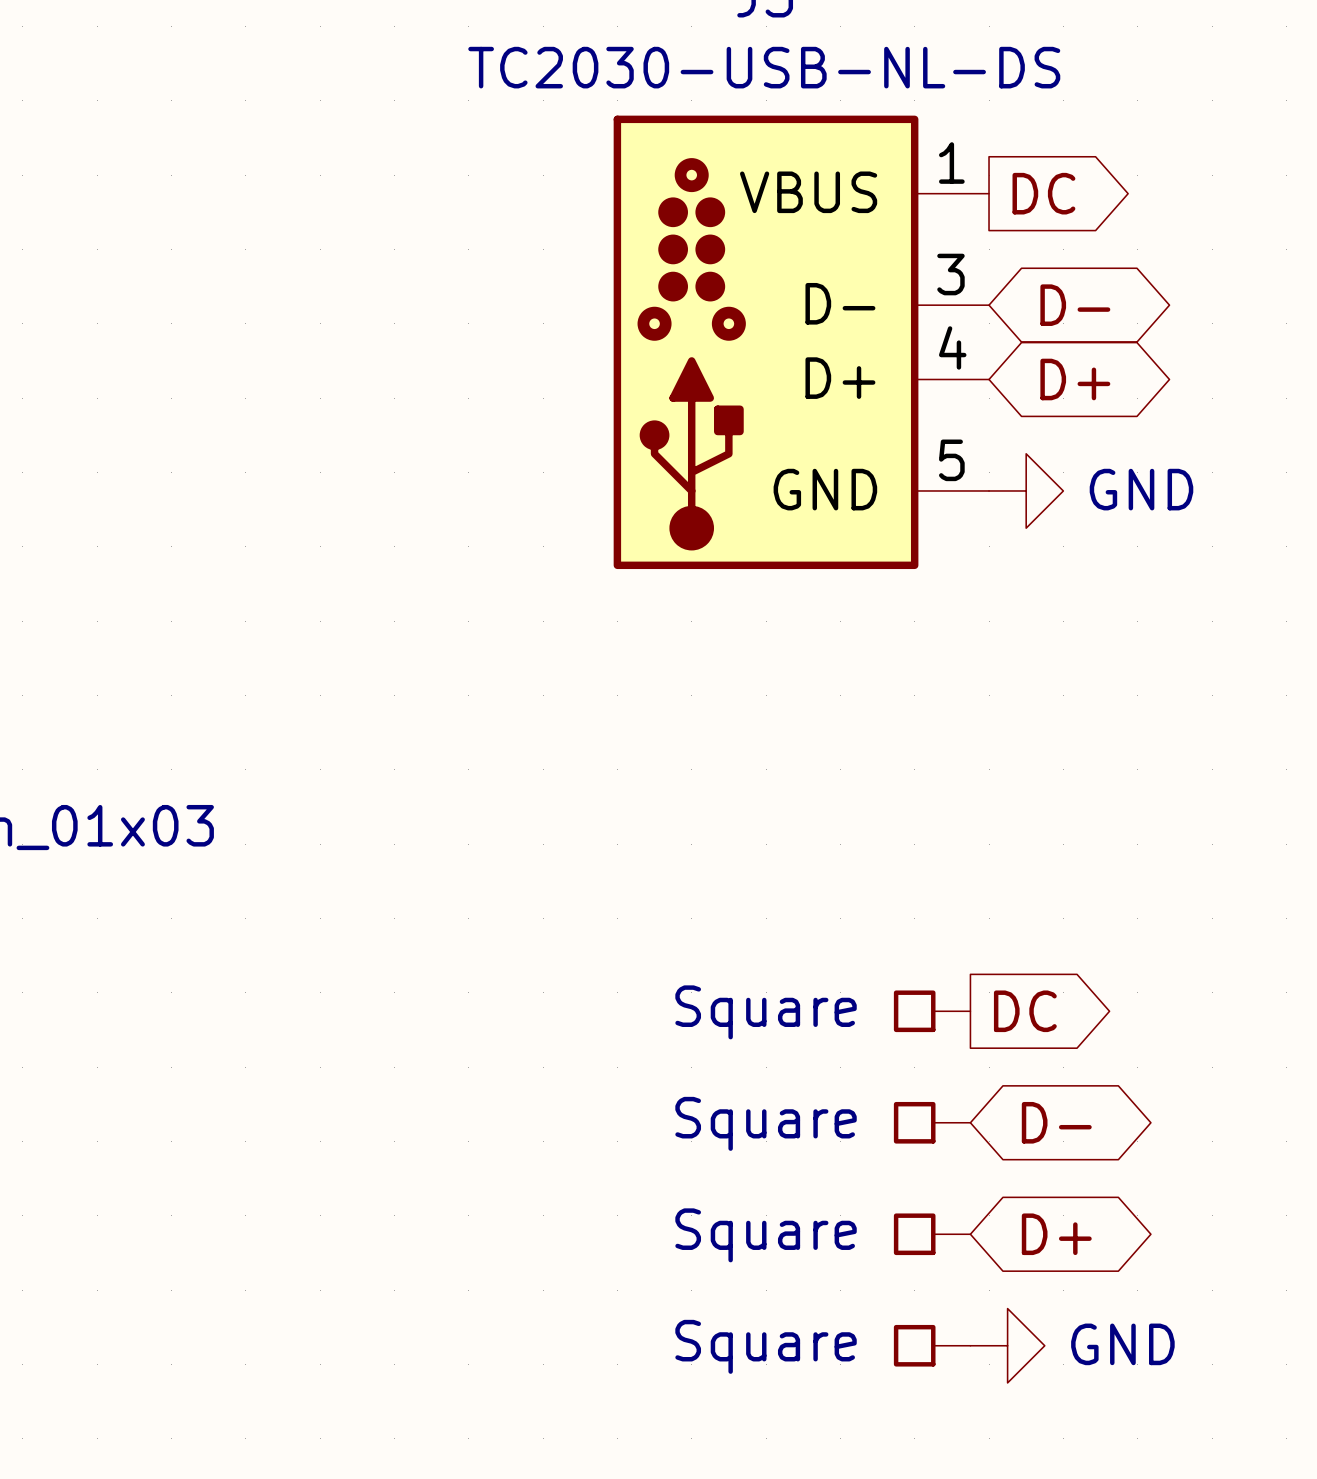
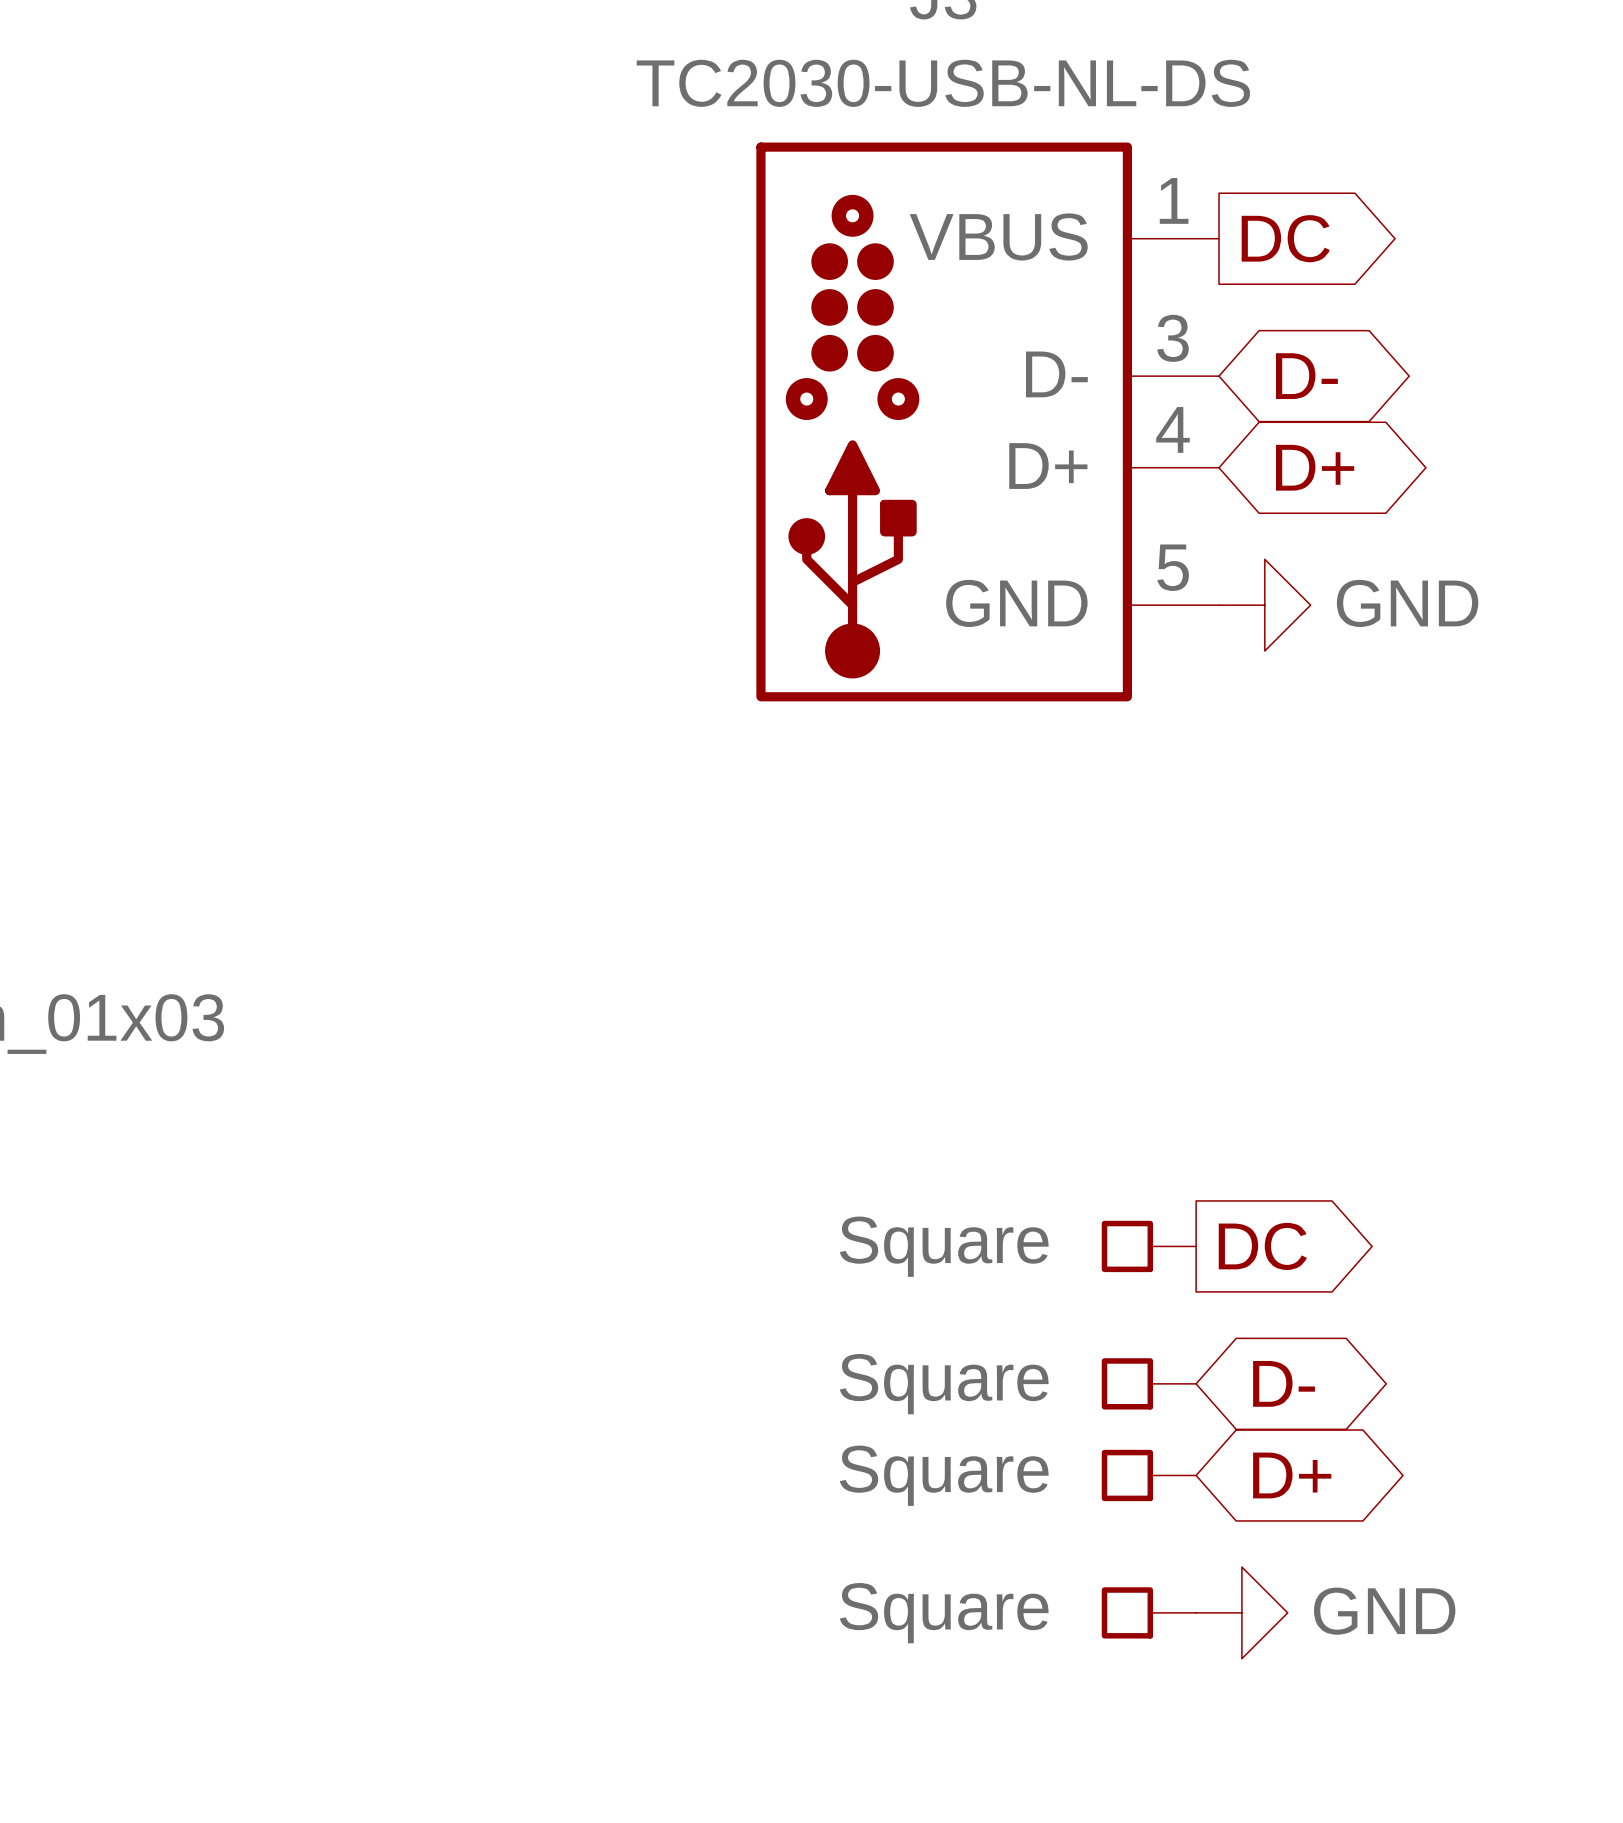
part: none -> Square (1148, 1475)
part: Square (932, 1234) -> none
global label position: D+ (1056, 1234) -> D+ (1292, 1475)
part: none -> Square (1148, 1612)
part: Square (932, 1345) -> none
power symbol position: GND (1007, 1345) -> GND (1241, 1612)

